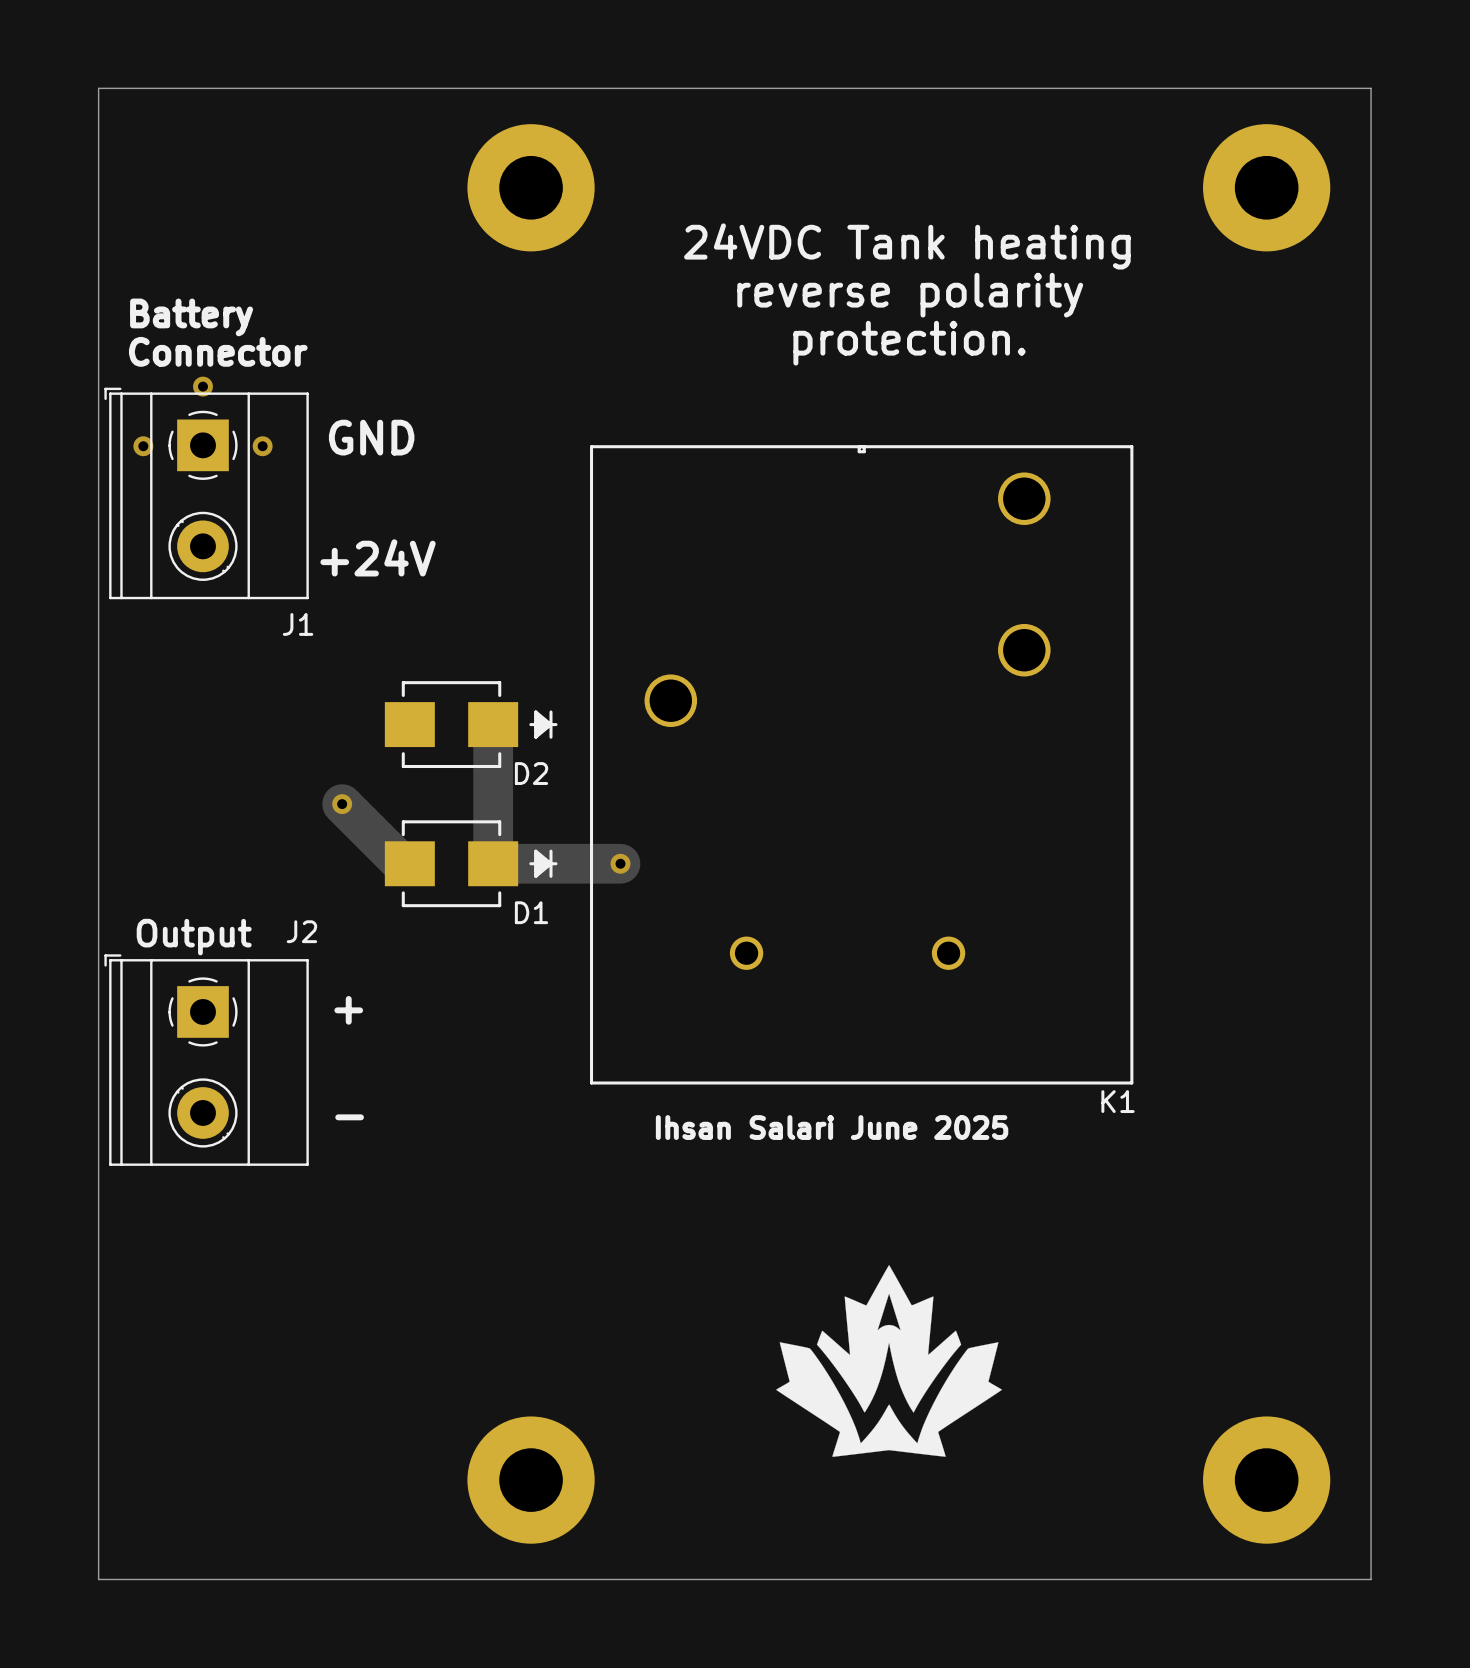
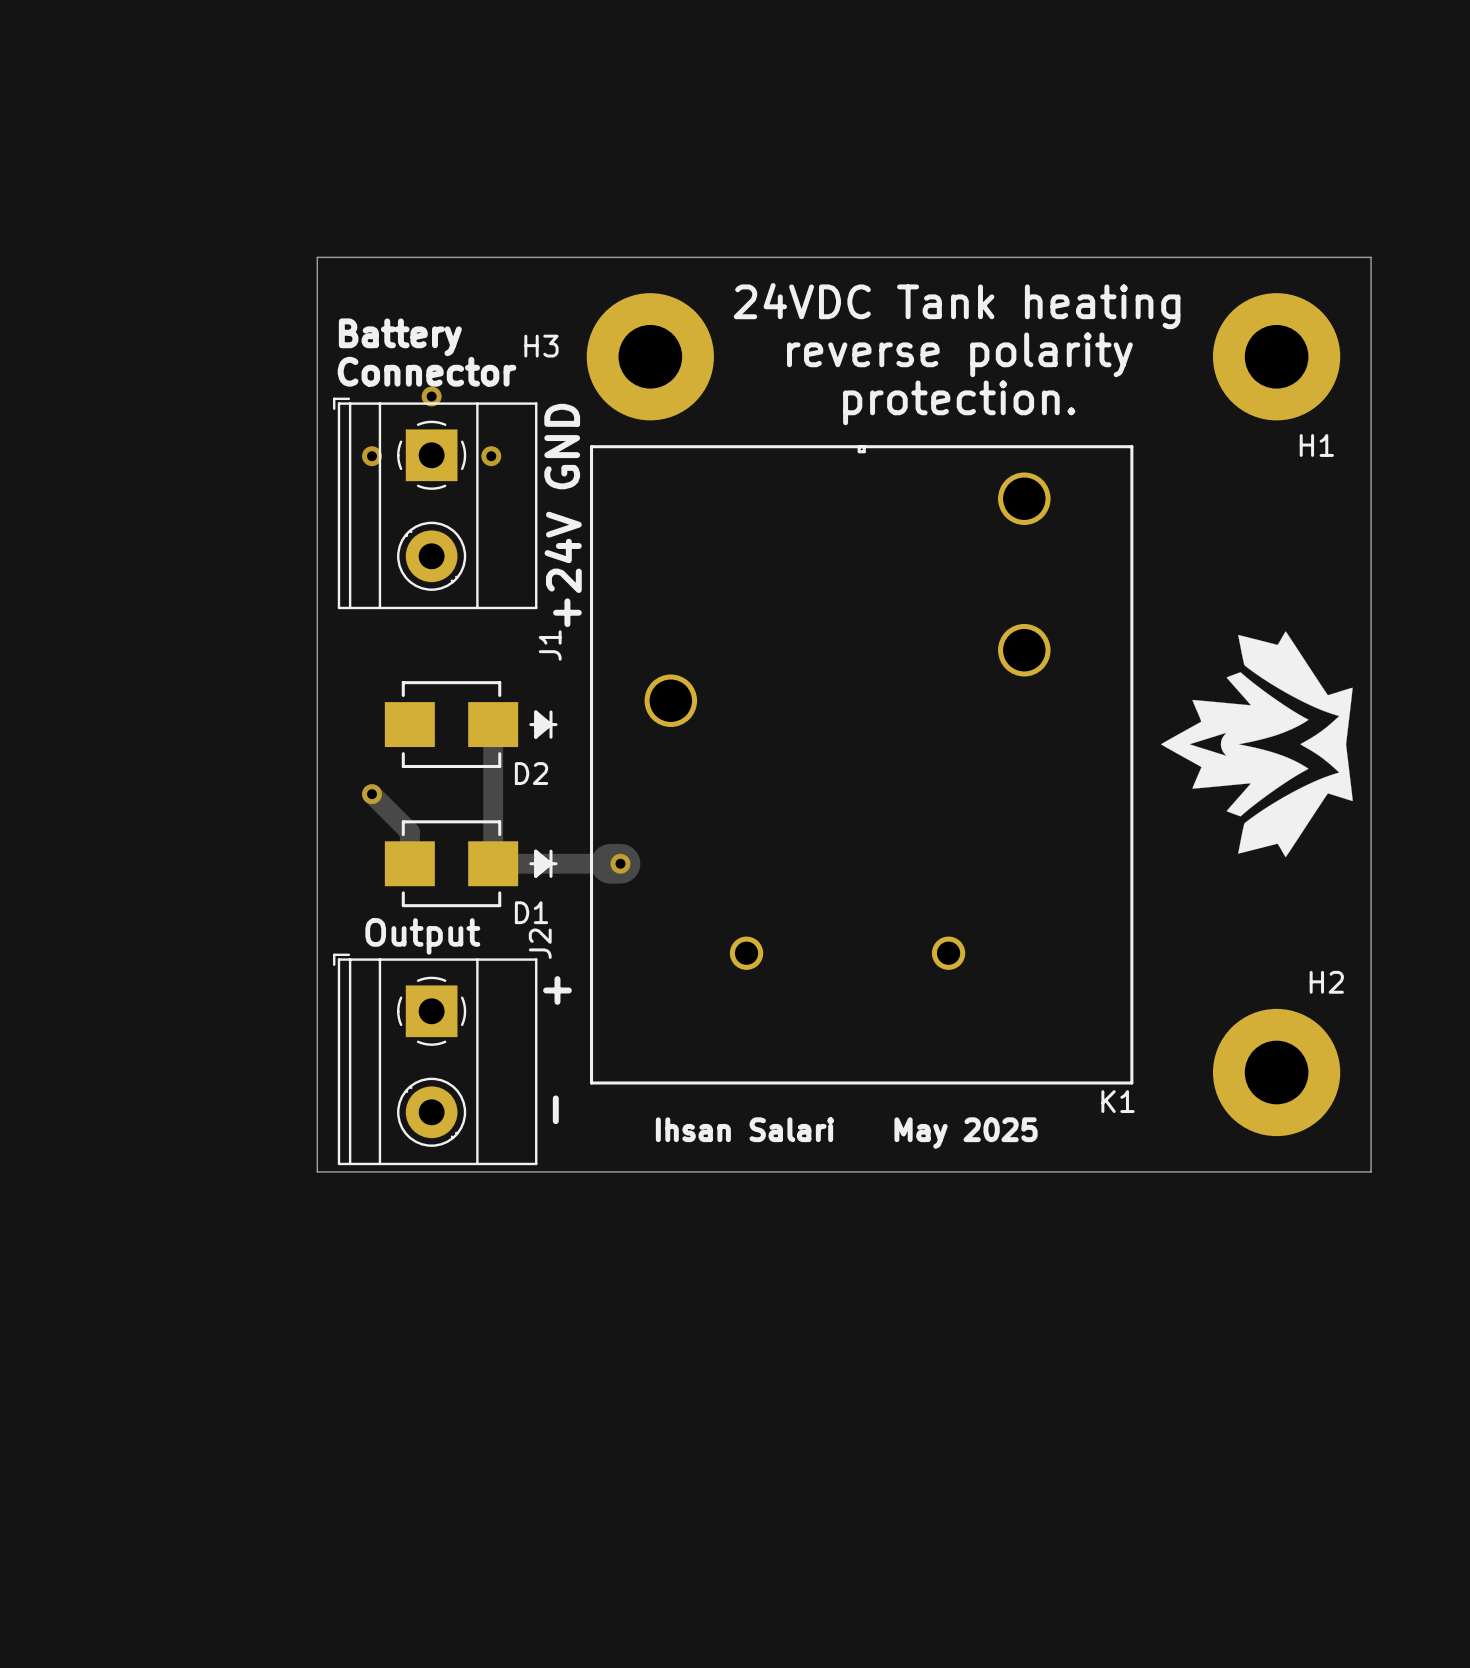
H3 position: (531, 187) -> (650, 356)
part: (1266, 187) -> none
text position: 24VDC Tank heating (907, 246) -> 24VDC Tank heating (957, 306)
board edge: (1371, 257) (1371, 88) (98, 88) (98, 1579) (1371, 1579) (1371, 1171) -> (1371, 257) (317, 257) (317, 1171) (1371, 1171)
text position: reverse polarity (910, 295) -> reverse polarity (959, 354)
text position: Battery (191, 317) -> Battery (400, 337)
text position: protection. (909, 343) -> protection. (959, 402)
text position: Connector (218, 351) -> Connector (427, 371)
H1: none -> (1276, 356)
via: (202, 386) -> none
via: none -> (431, 396)
text rotation: 0° (371, 437) -> 90° counterclockwise (562, 446)
text position: GND (371, 437) -> GND (562, 446)
via: (143, 446) -> none
via: (262, 446) -> none
via: none -> (371, 456)
via: none -> (491, 456)
J1 position: (206, 493) -> (435, 503)
text rotation: 0° (378, 557) -> 90° counterclockwise (563, 569)
text position: +24V (378, 557) -> +24V (563, 569)
J1 name rotation: 0° (298, 624) -> 90° counterclockwise (550, 645)
drawing: none -> [1161, 631, 1353, 858]
track width: thick (493, 724) (493, 863) (610, 863) -> thin (493, 724) (493, 863) (610, 863)
track: (342, 804) (401, 863) (409, 863) -> (371, 794) (409, 832) (409, 863)
via position: (342, 804) -> (371, 794)
J2 name rotation: 0° (301, 931) -> 90° counterclockwise (540, 943)
text position: + (348, 1010) -> + (557, 990)
J2 position: (206, 1060) -> (435, 1059)
H2: none -> (1276, 1072)
text rotation: 0° (349, 1117) -> 90° clockwise (555, 1109)
text position: - (349, 1117) -> - (555, 1109)
text: Ihsan Salari June 2025 (832, 1127) -> Ihsan Salari (744, 1129)
text: none -> May 2025 (966, 1133)
drawing: [776, 1265, 1003, 1457] -> none
part: (531, 1480) -> none
part: (1266, 1480) -> none

